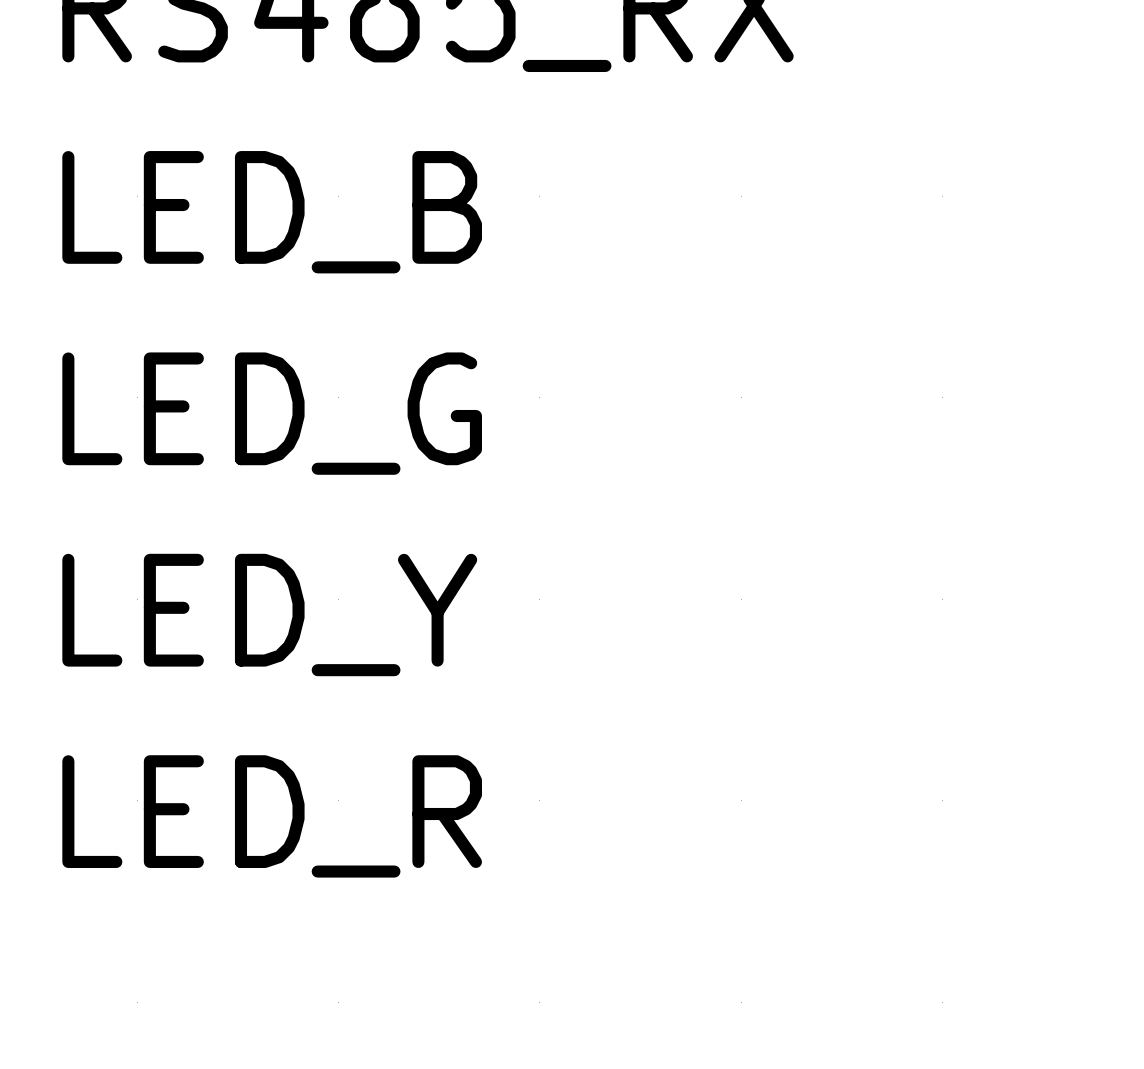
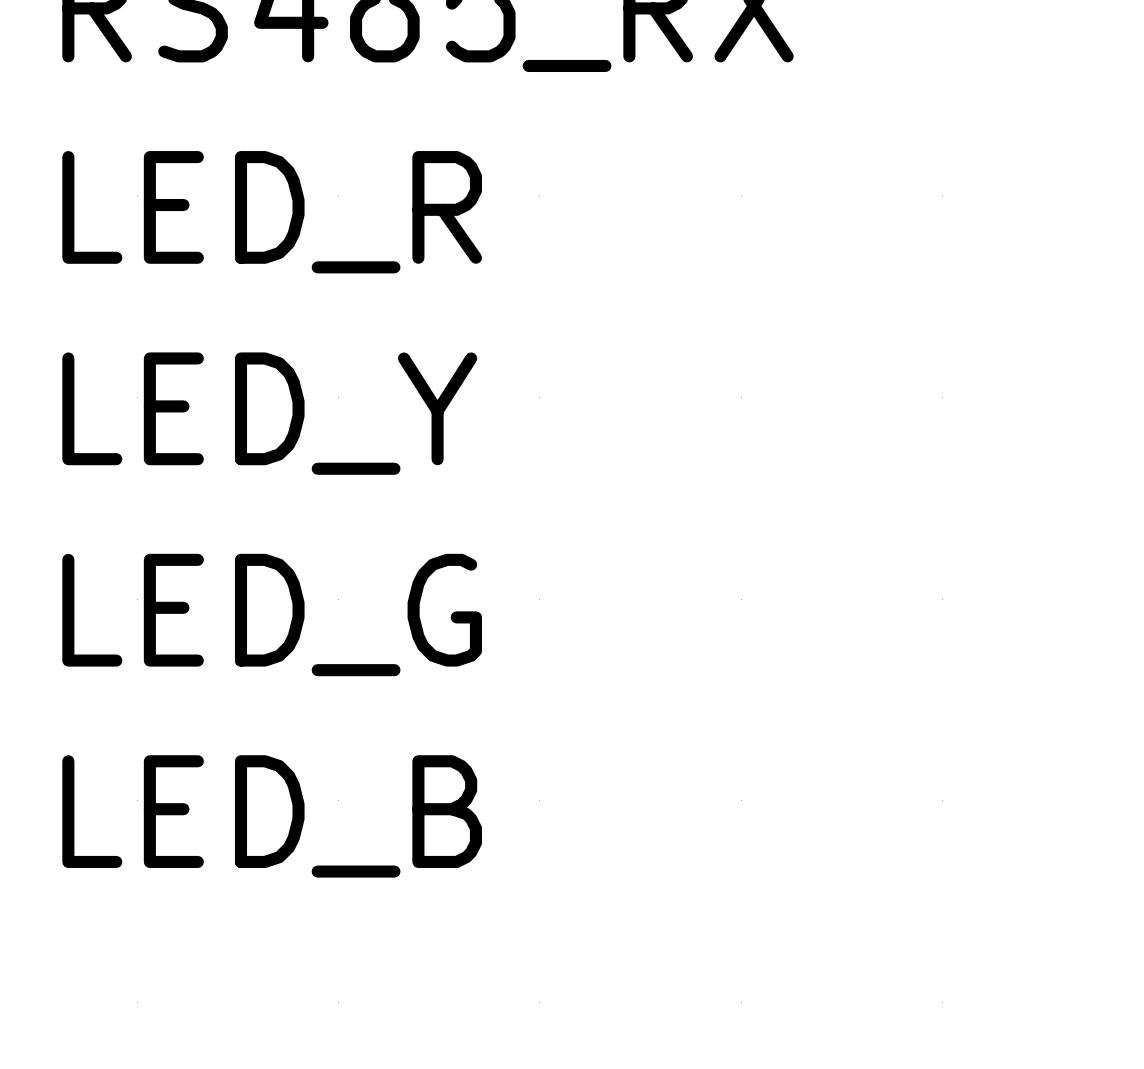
label: LED_B (272, 212) -> LED_R (272, 212)
label: LED_G (272, 413) -> LED_Y (269, 413)
label: LED_Y (269, 615) -> LED_G (272, 615)
label: LED_R (272, 816) -> LED_B (272, 816)

